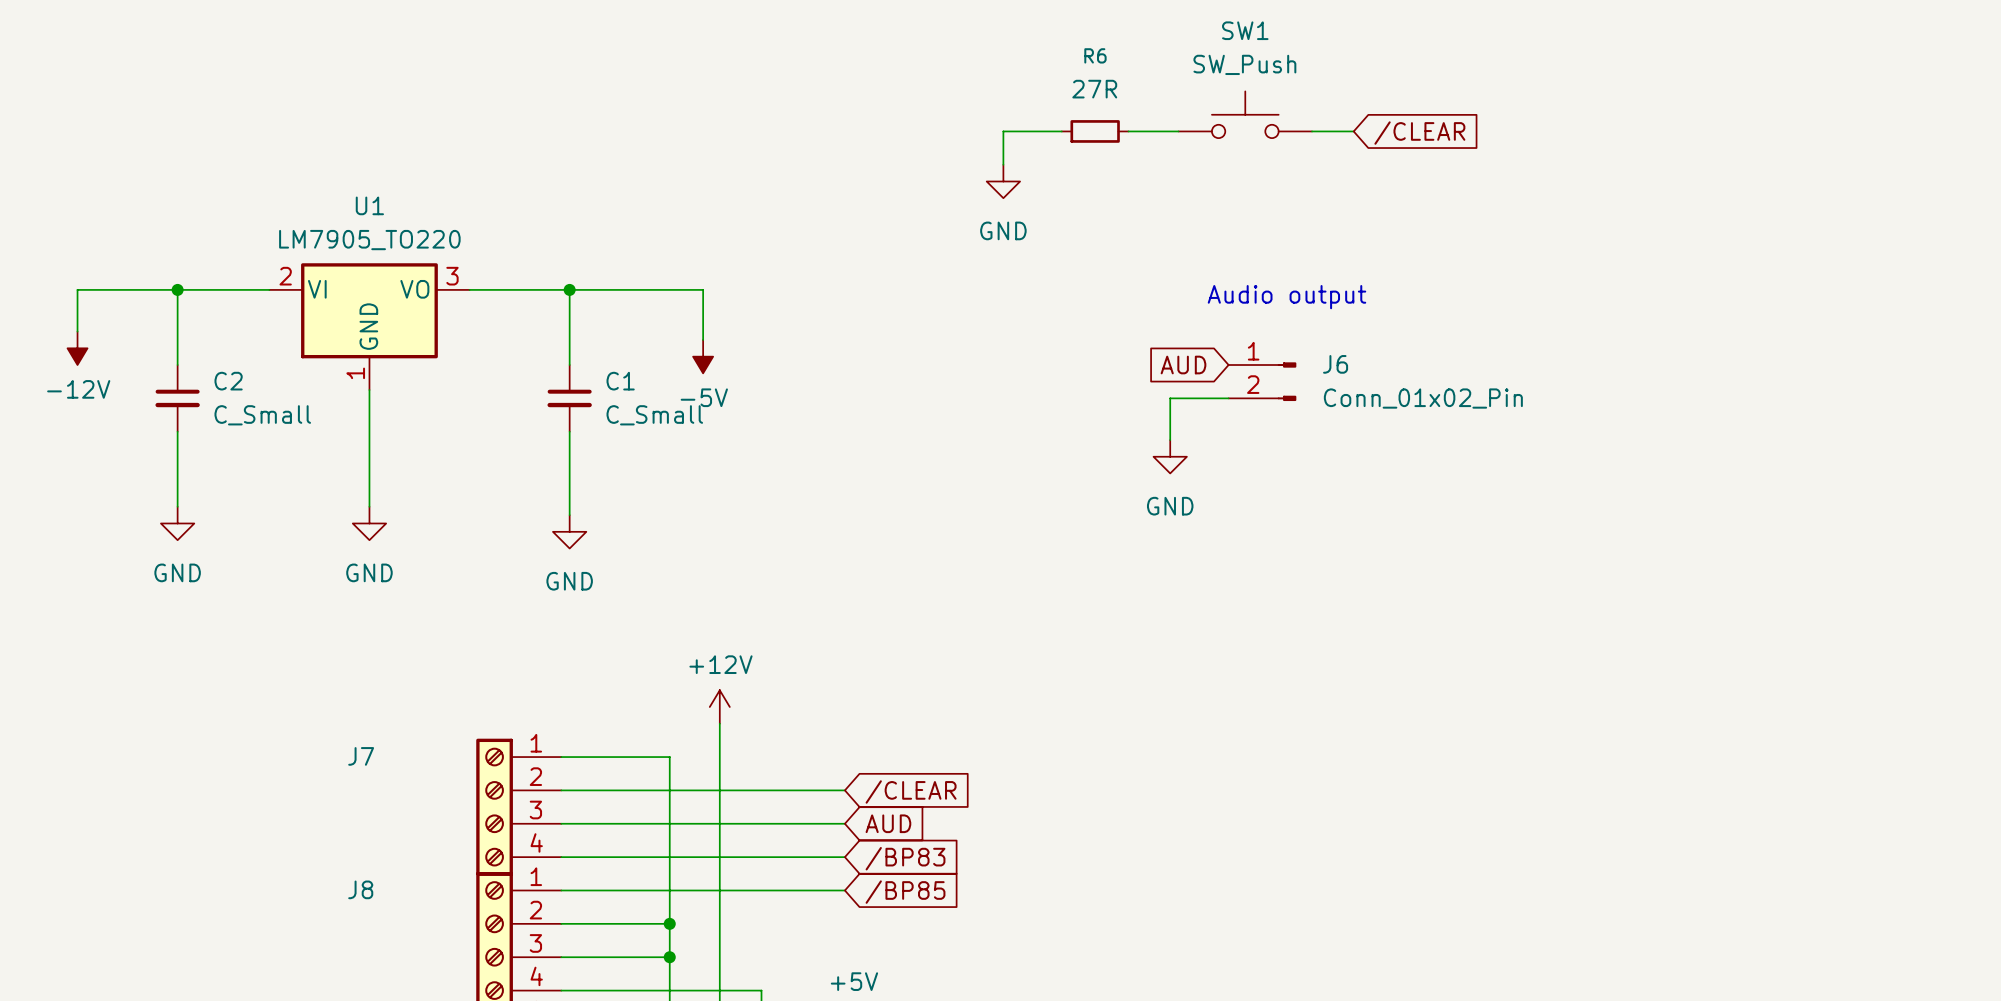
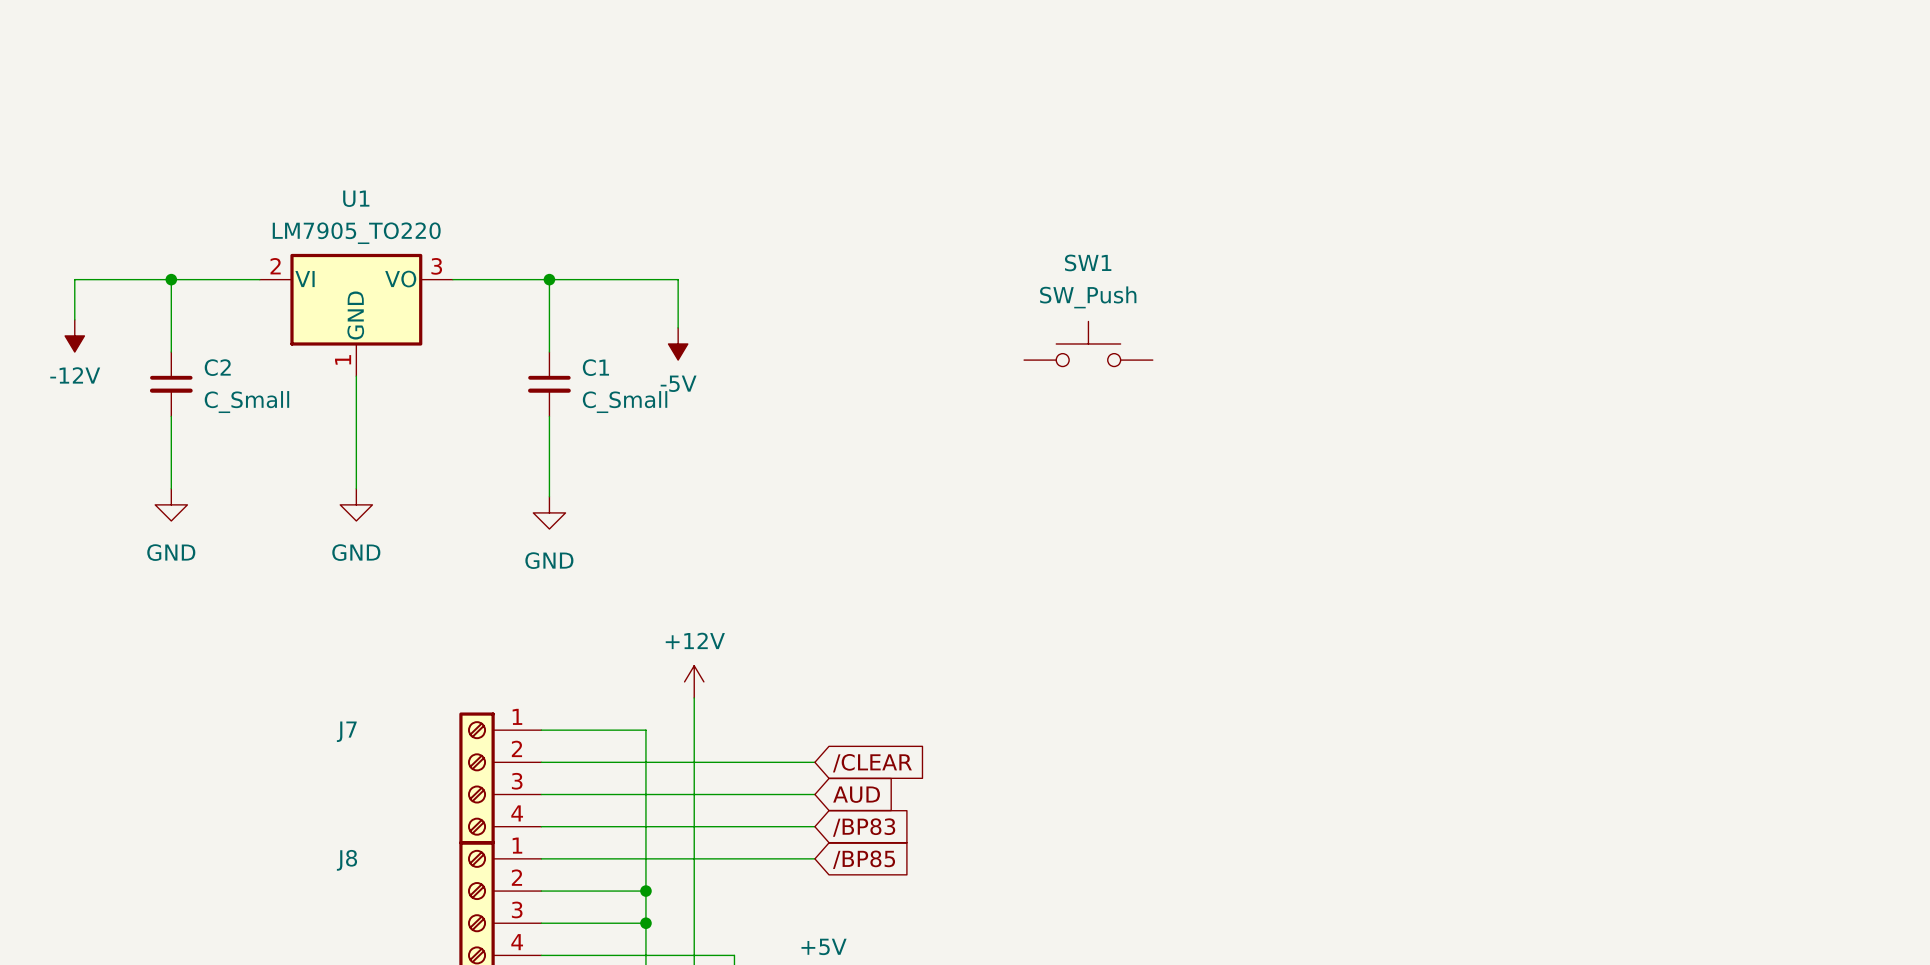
SW1 position: (1245, 114) -> (1088, 343)
wire: (1061, 131) (1003, 131) (1003, 164) -> none
R6: 27R (1095, 131) -> none
wire: (1128, 131) (1178, 131) -> none
wire: (1312, 131) (1353, 131) -> none
global label: /CLEAR (1419, 133) -> none
power symbol: GND (1003, 181) -> none
text: Audio output (1286, 297) -> none
global label: AUD (1183, 365) -> none
J6: Conn_01x02_Pin (1262, 381) -> none
wire: (1228, 398) (1170, 398) (1170, 440) -> none
power symbol: GND (1170, 456) -> none

